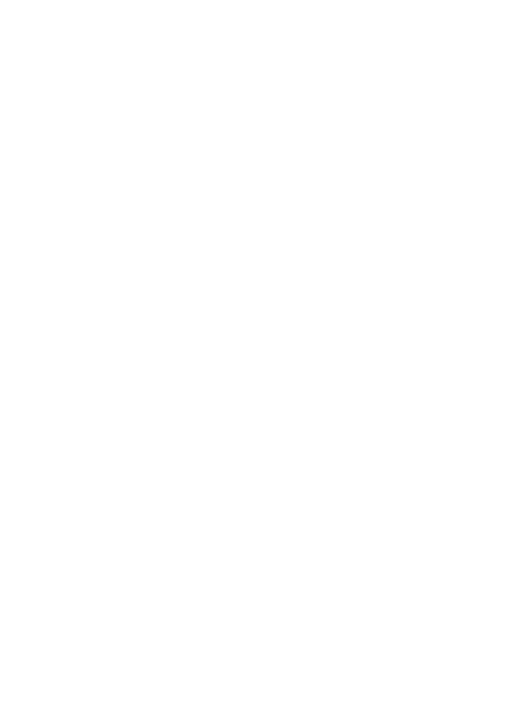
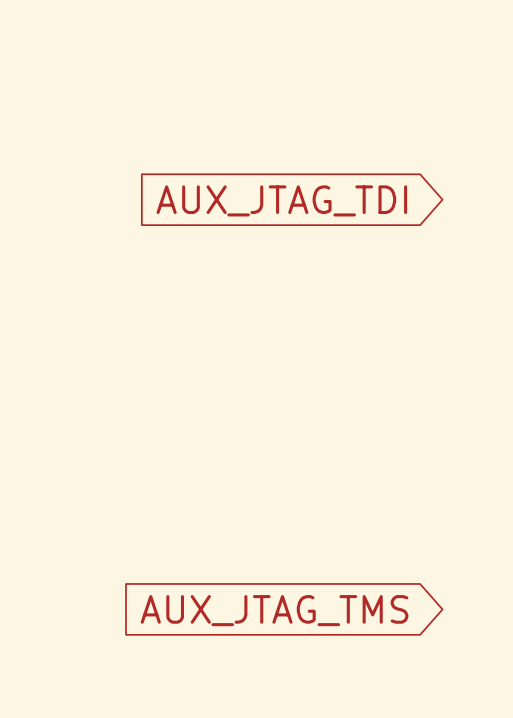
global label: none -> AUX_JTAG_TDI (281, 200)
global label: none -> AUX_JTAG_TMS (274, 610)

